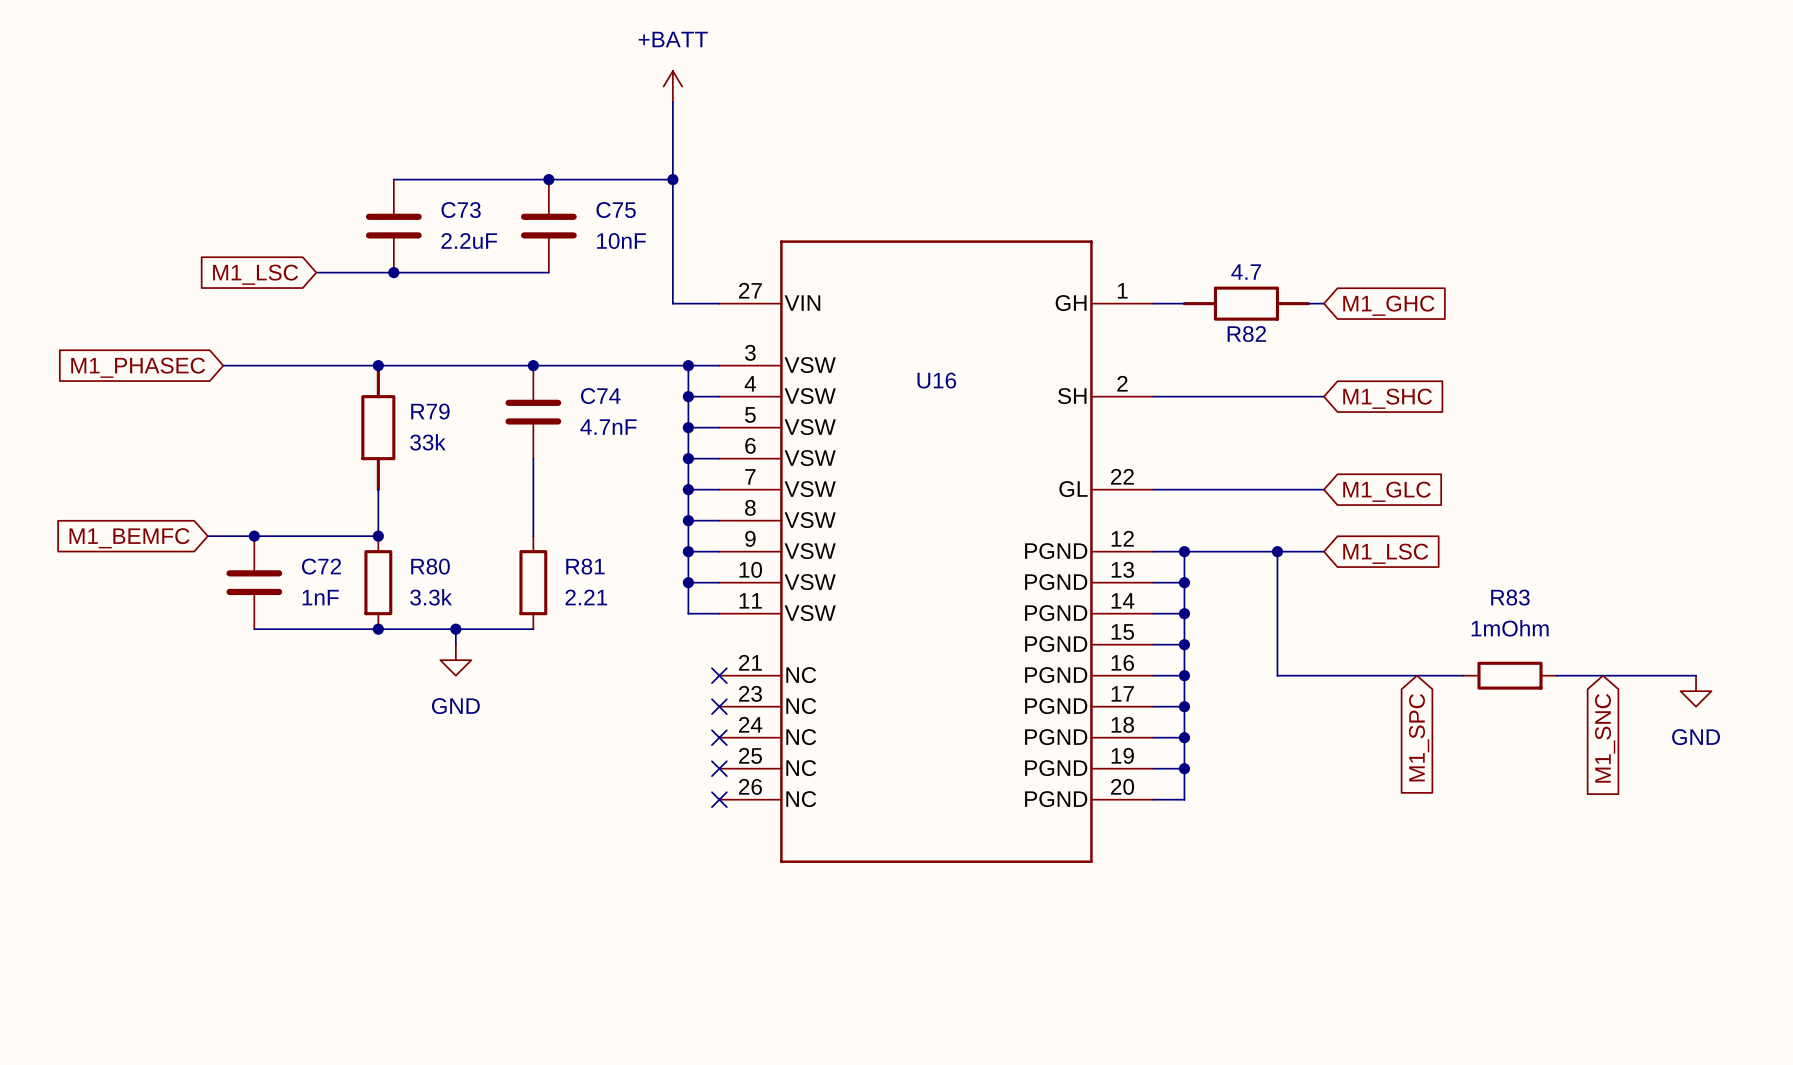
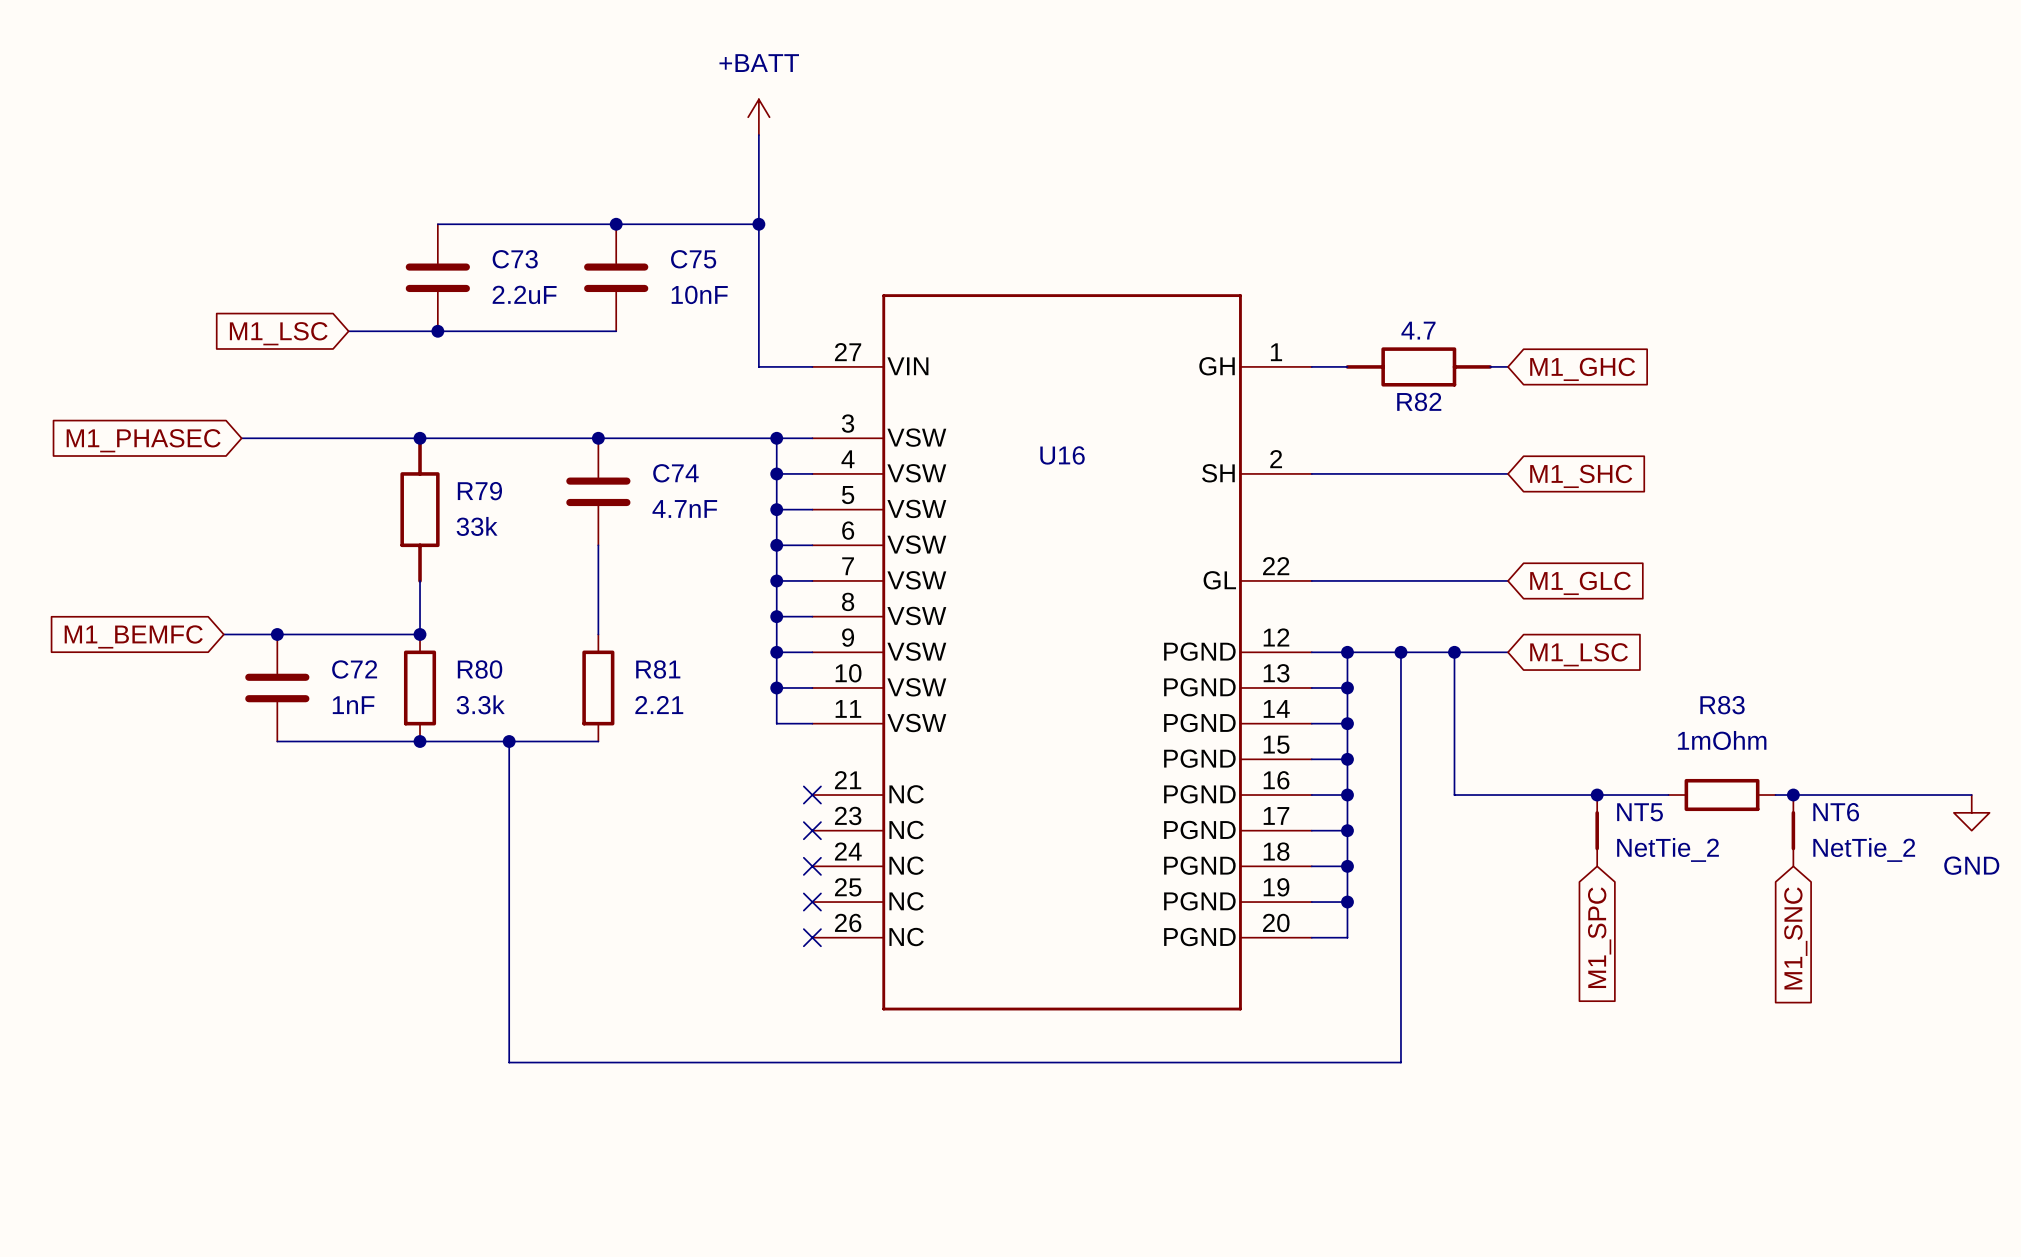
wire: none -> (1400, 652) (1400, 1062) (509, 1062) (509, 759)
junction: none -> (1400, 652)
power symbol: GND (455, 660) -> none
junction: none -> (1597, 795)
junction: none -> (1793, 795)
wire: none -> (1936, 795) (1971, 795)
power symbol position: GND (1696, 691) -> GND (1971, 812)
NT5: none -> NetTie_2 (1597, 830)
NT6: none -> NetTie_2 (1793, 830)
global label position: M1_SPC (1419, 737) -> M1_SPC (1599, 937)
global label position: M1_SNC (1605, 738) -> M1_SNC (1795, 938)

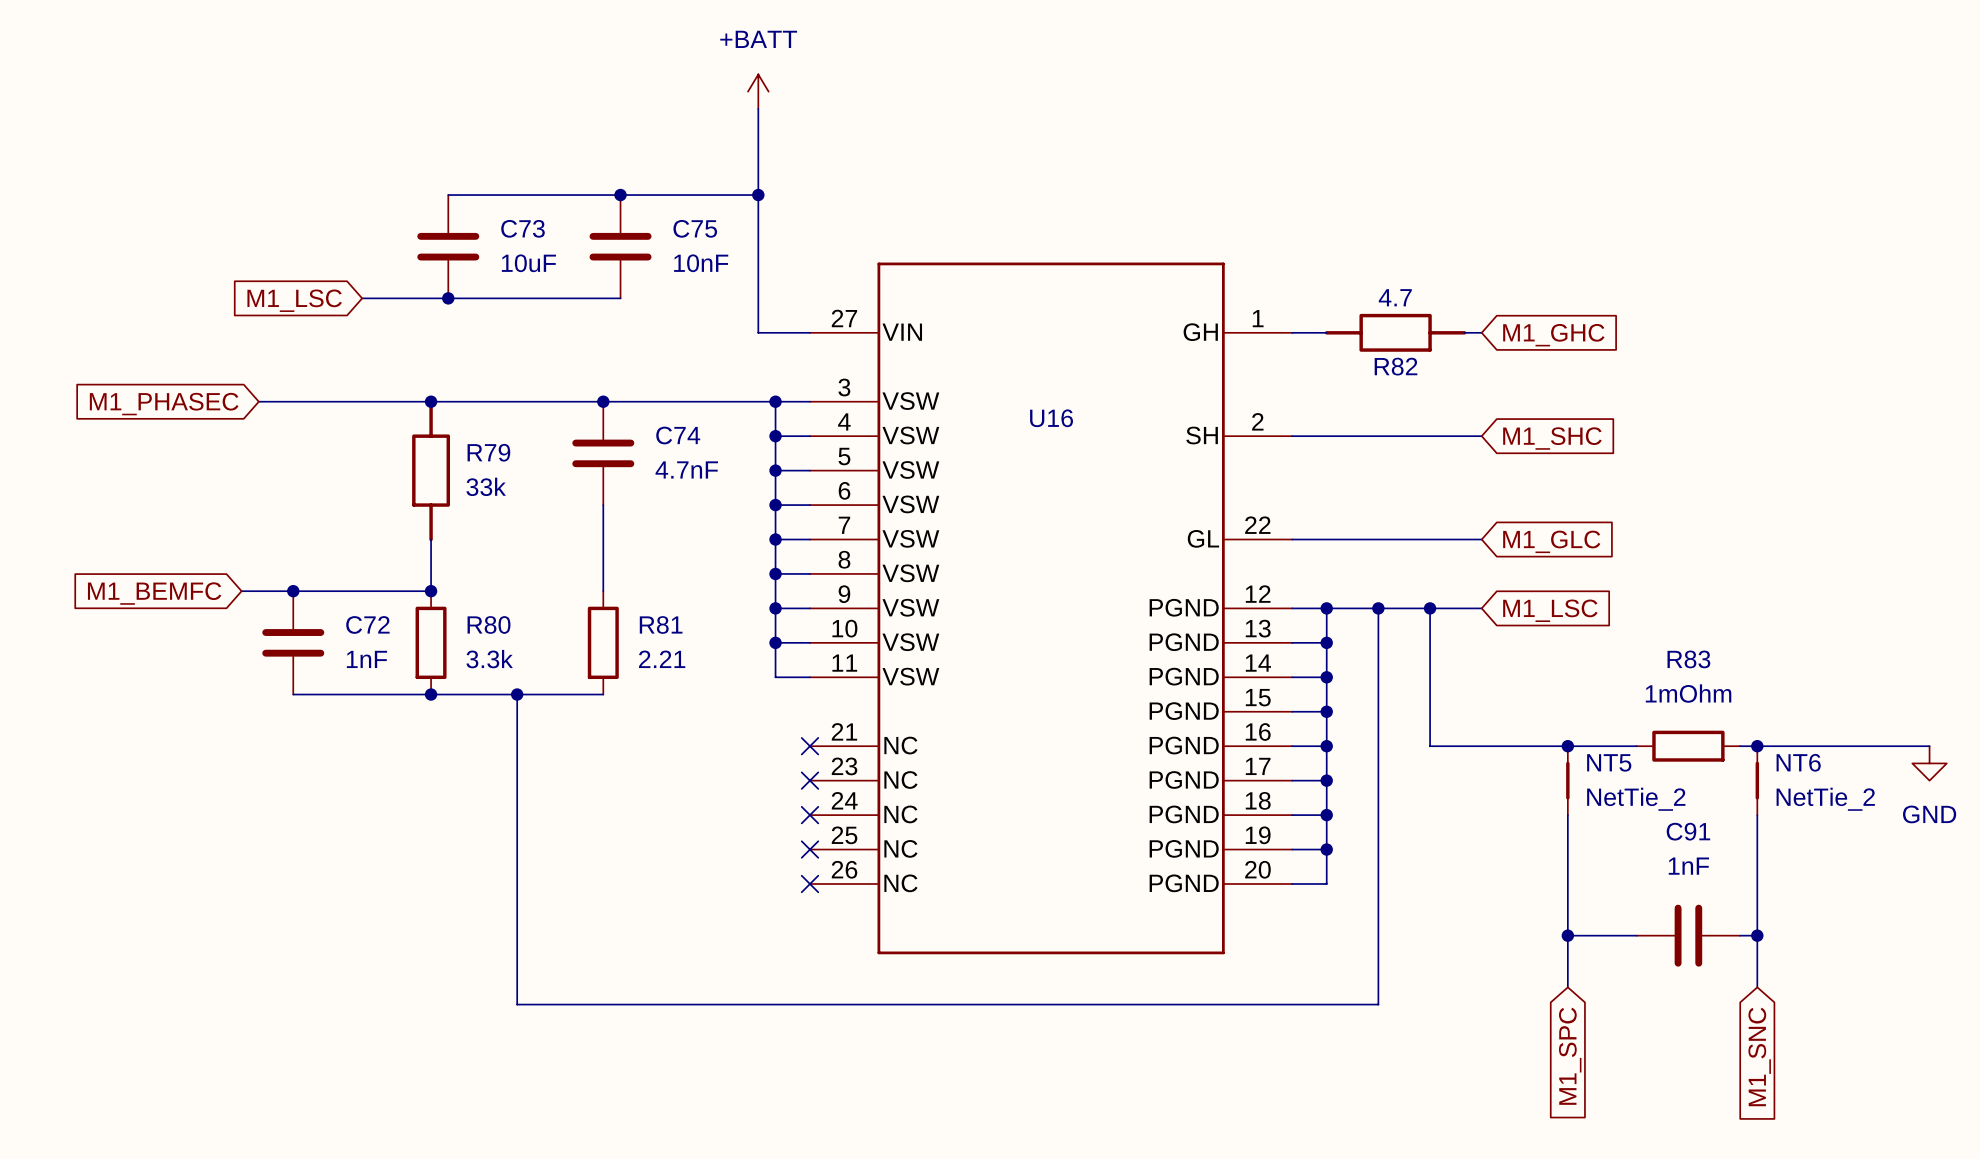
C73 value: 2.2uF (524, 294) -> 10uF (528, 263)
wire: none -> (1567, 815) (1567, 987)
wire: none -> (1757, 815) (1757, 987)
global label position: M1_SPC (1599, 937) -> M1_SPC (1570, 1056)
global label position: M1_SNC (1795, 938) -> M1_SNC (1759, 1056)
wire: none -> (1567, 935) (1636, 935)
junction: none -> (1567, 935)
C91: none -> 1nF (1688, 935)
wire: none -> (1740, 935) (1757, 935)
junction: none -> (1757, 935)

